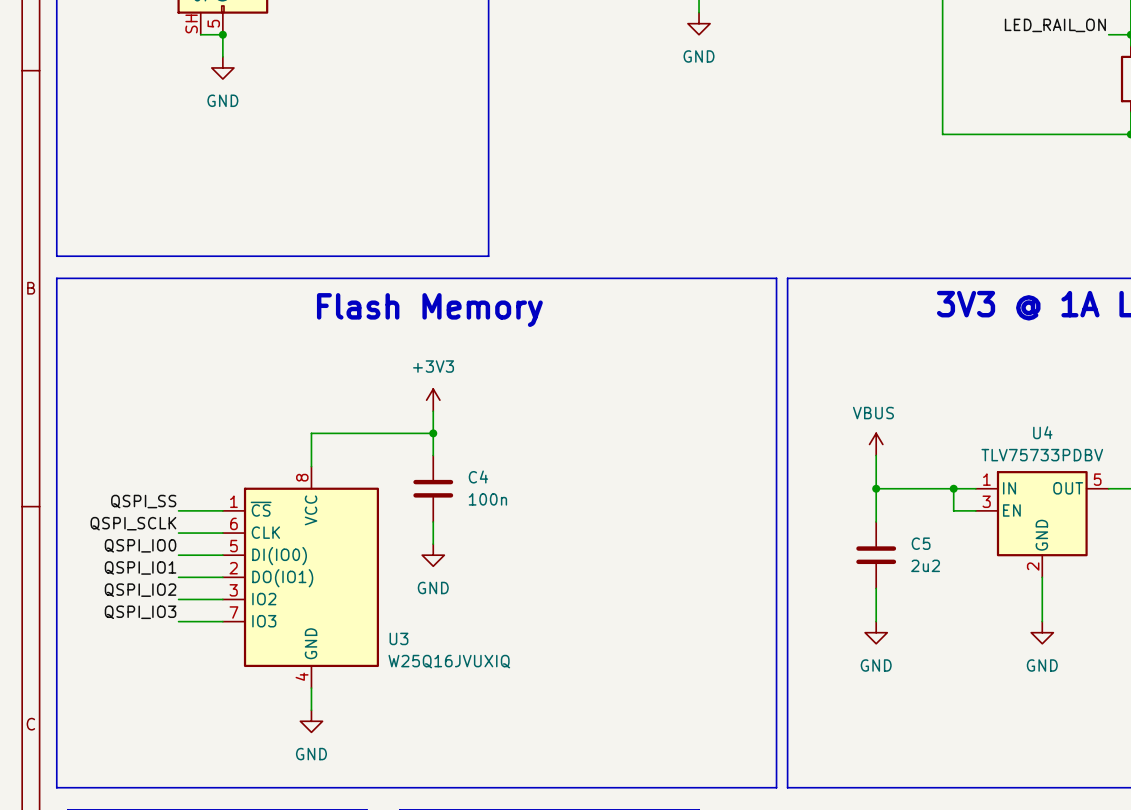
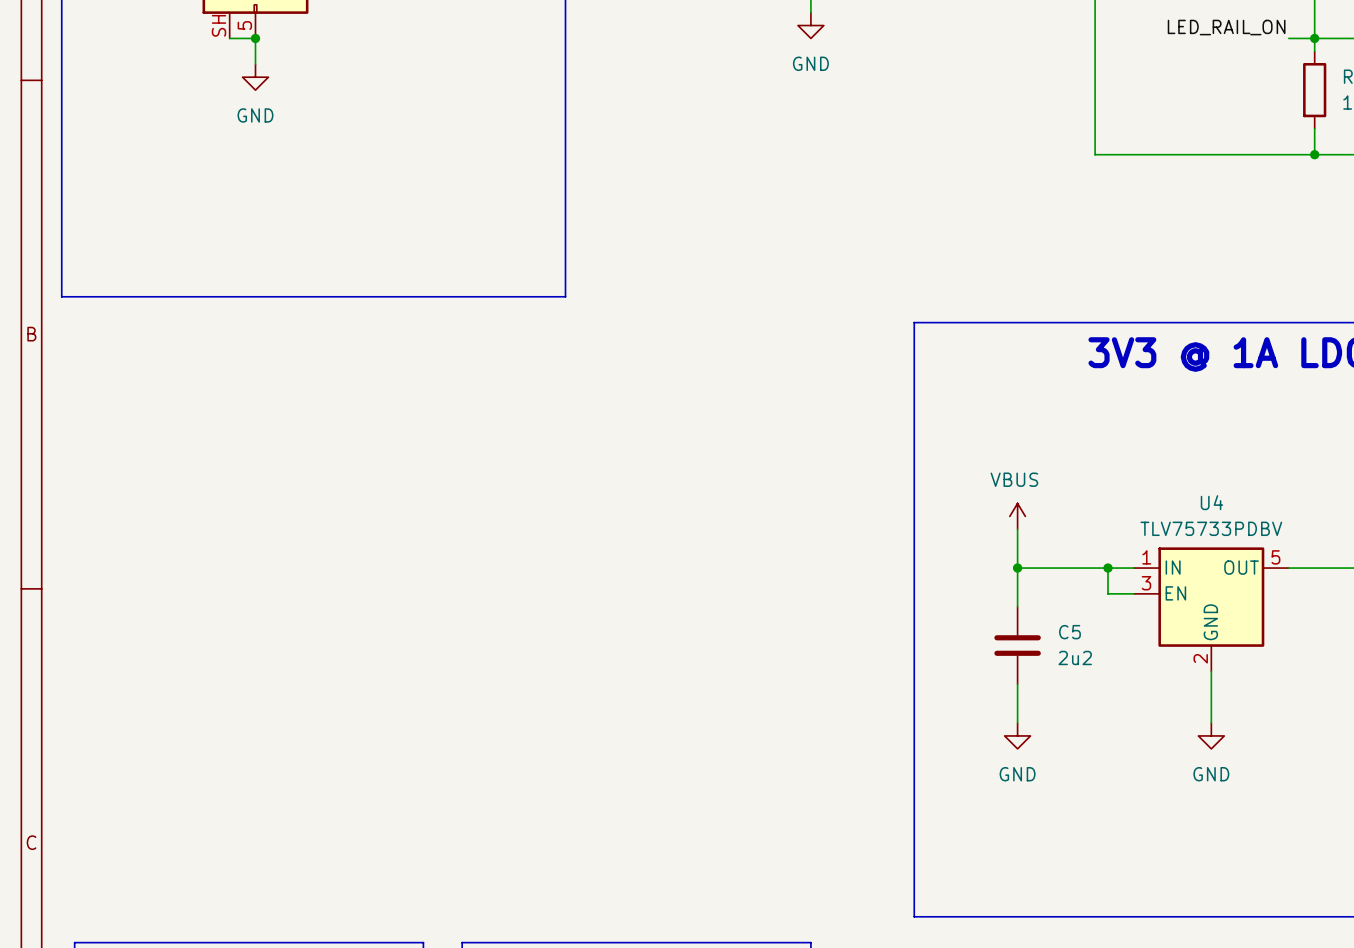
line: (56, 278) (776, 278) (776, 787) (56, 787) (56, 278) -> none
text: Flash Memory (429, 310) -> none
power symbol: +3V3 (433, 400) -> none
wire: (433, 411) (433, 455) -> none
wire: (433, 433) (311, 433) (311, 466) -> none
junction: (433, 433) -> none
C4: 100n (433, 488) -> none
label: QSPI_SS (143, 501) -> none
wire: (178, 510) (222, 510) -> none
wire: (433, 521) (433, 544) -> none
label: QSPI_SCLK (133, 523) -> none
wire: (178, 533) (222, 533) -> none
label: QSPI_IO0 (140, 545) -> none
wire: (178, 555) (222, 555) -> none
power symbol: GND (433, 555) -> none
label: QSPI_IO1 (140, 567) -> none
wire: (178, 577) (222, 577) -> none
U3: W25Q16JVUXIQ (300, 577) -> none
label: QSPI_IO2 (140, 590) -> none
wire: (178, 599) (222, 599) -> none
label: QSPI_IO3 (140, 612) -> none
wire: (178, 621) (222, 621) -> none
wire: (311, 688) (311, 710) -> none
power symbol: GND (311, 721) -> none

